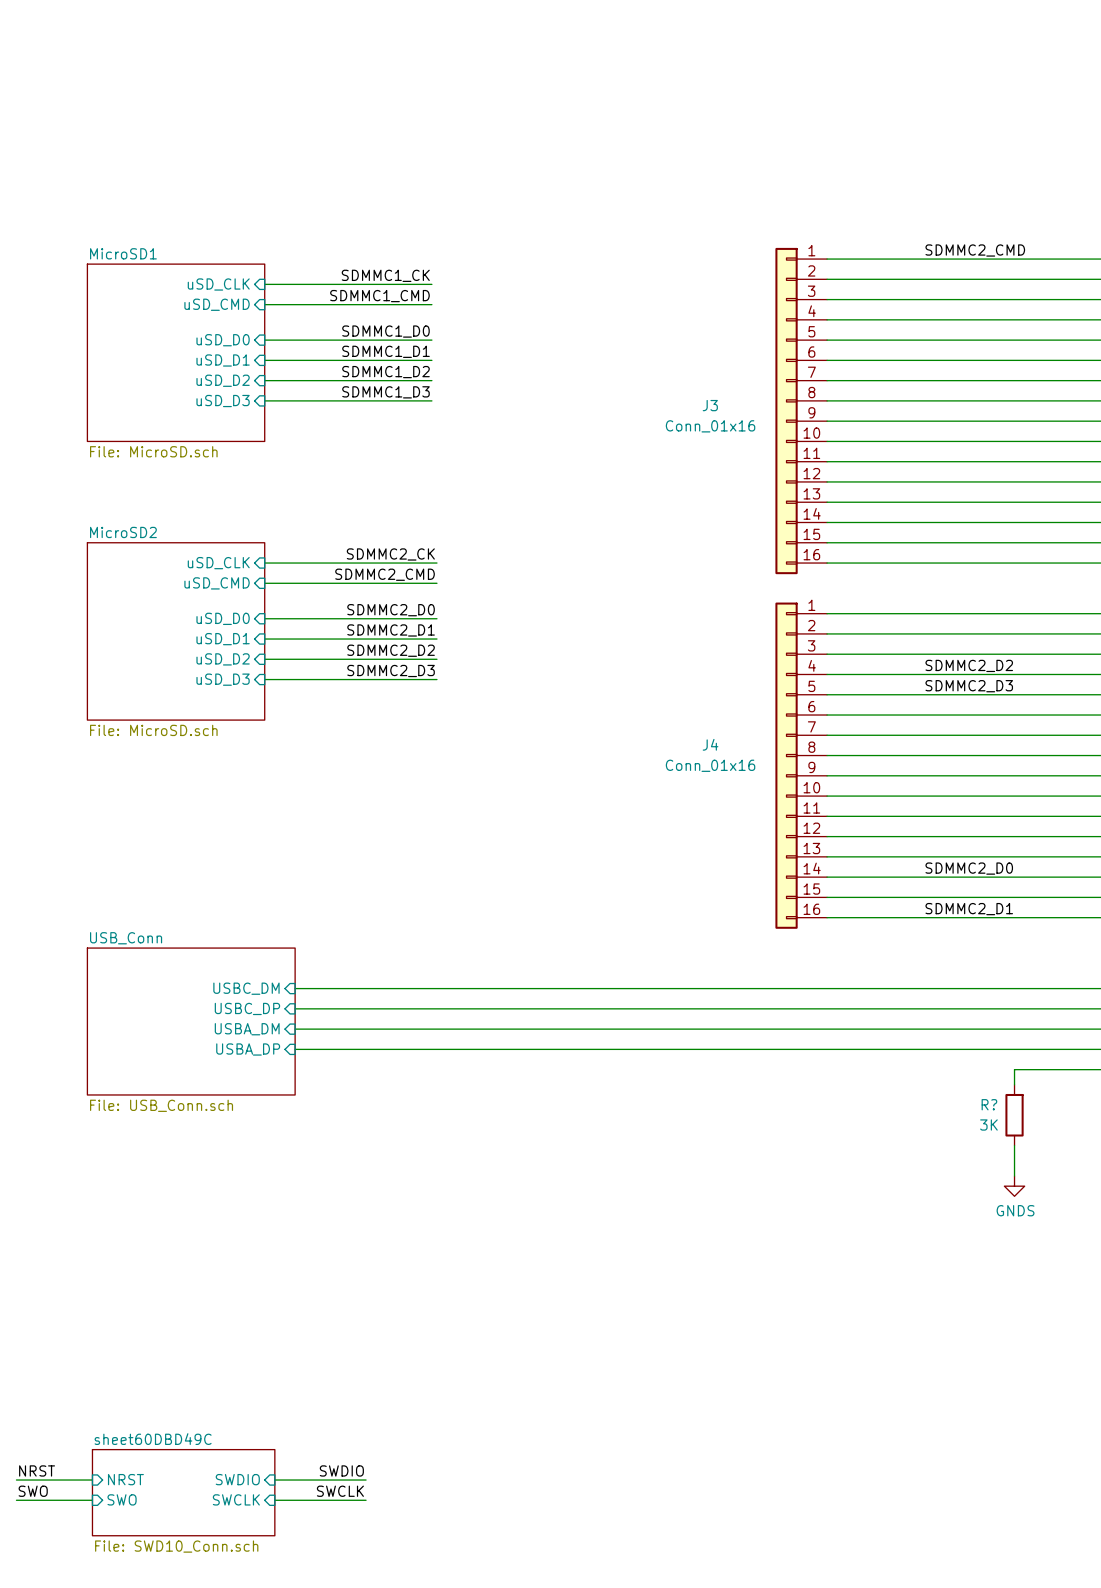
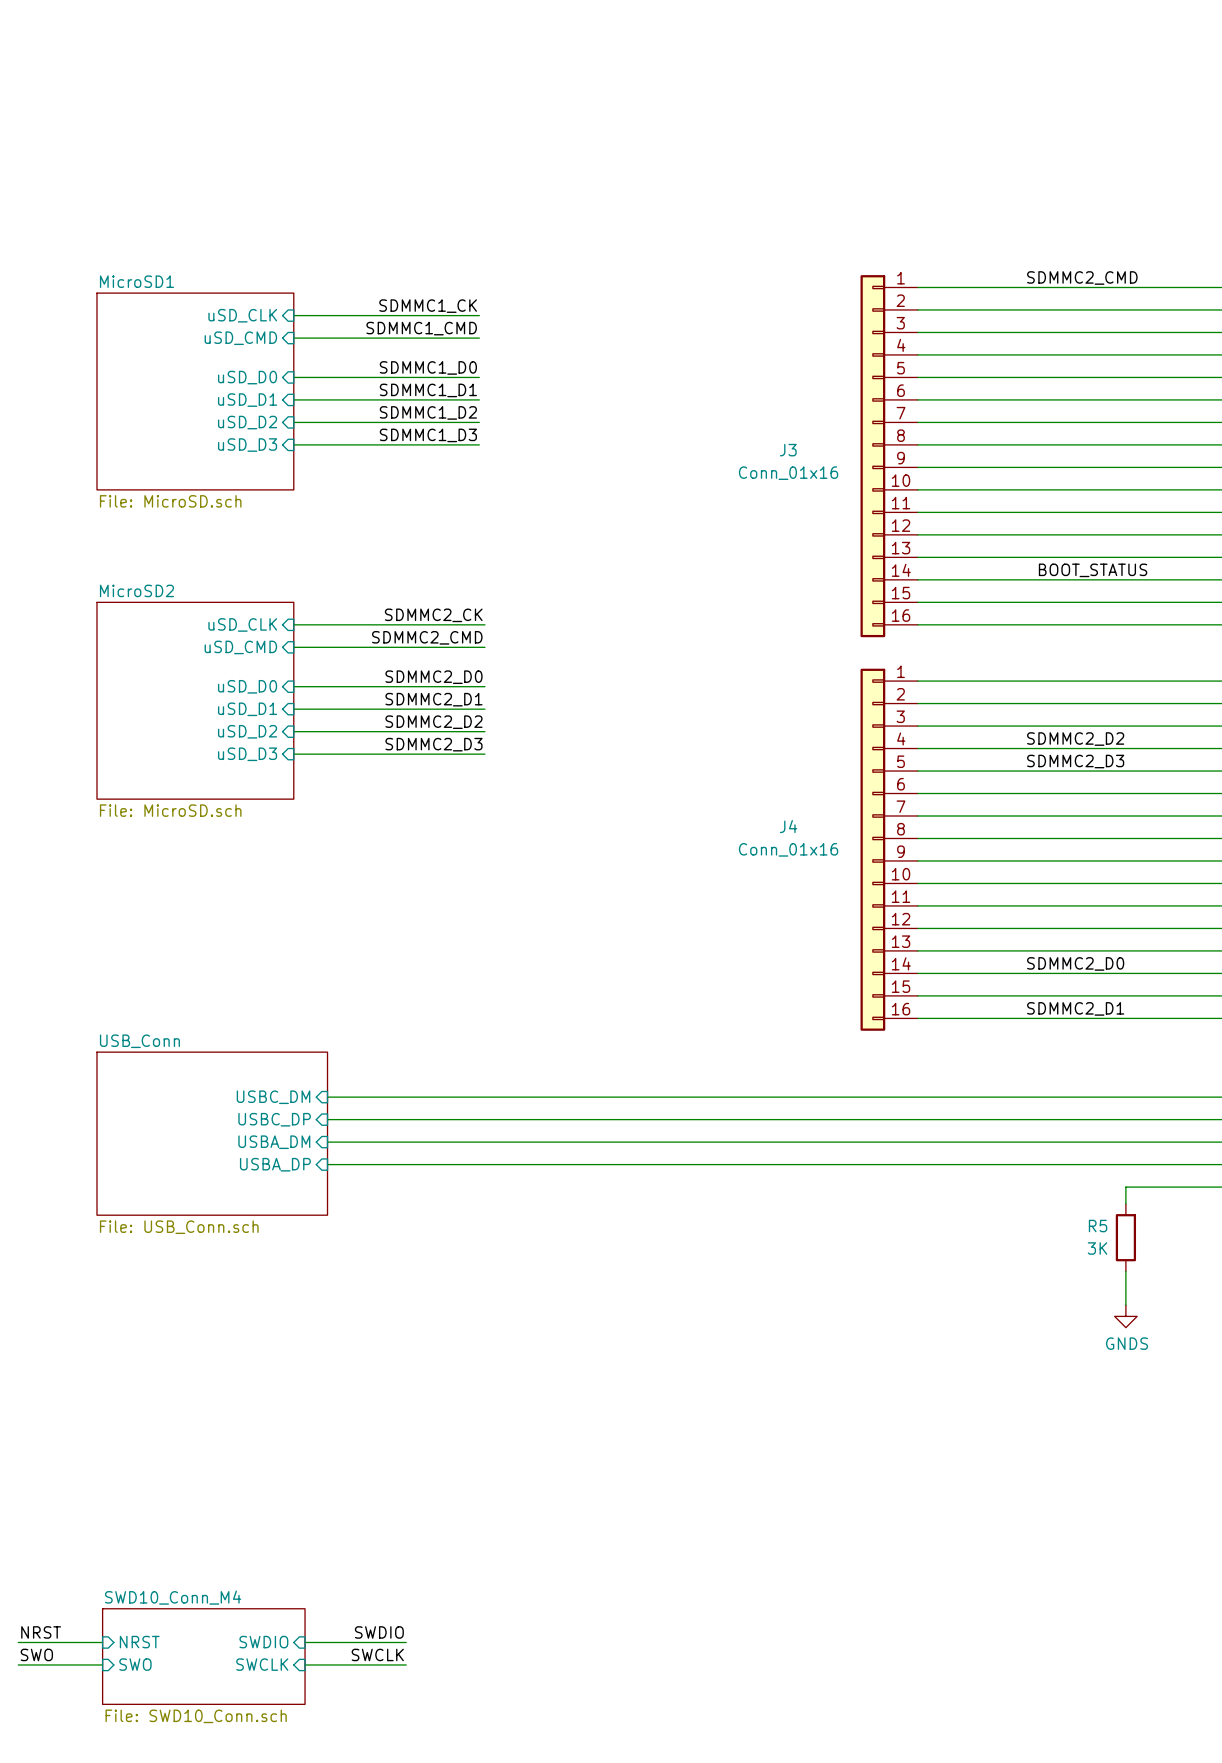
label: none -> BOOT_STATUS (1093, 570)
R? name: R? (989, 1104) -> R5 (1098, 1226)
sheet sheet60DBD49C name: sheet60DBD49C (153, 1439) -> SWD10_Conn_M4 (173, 1597)

